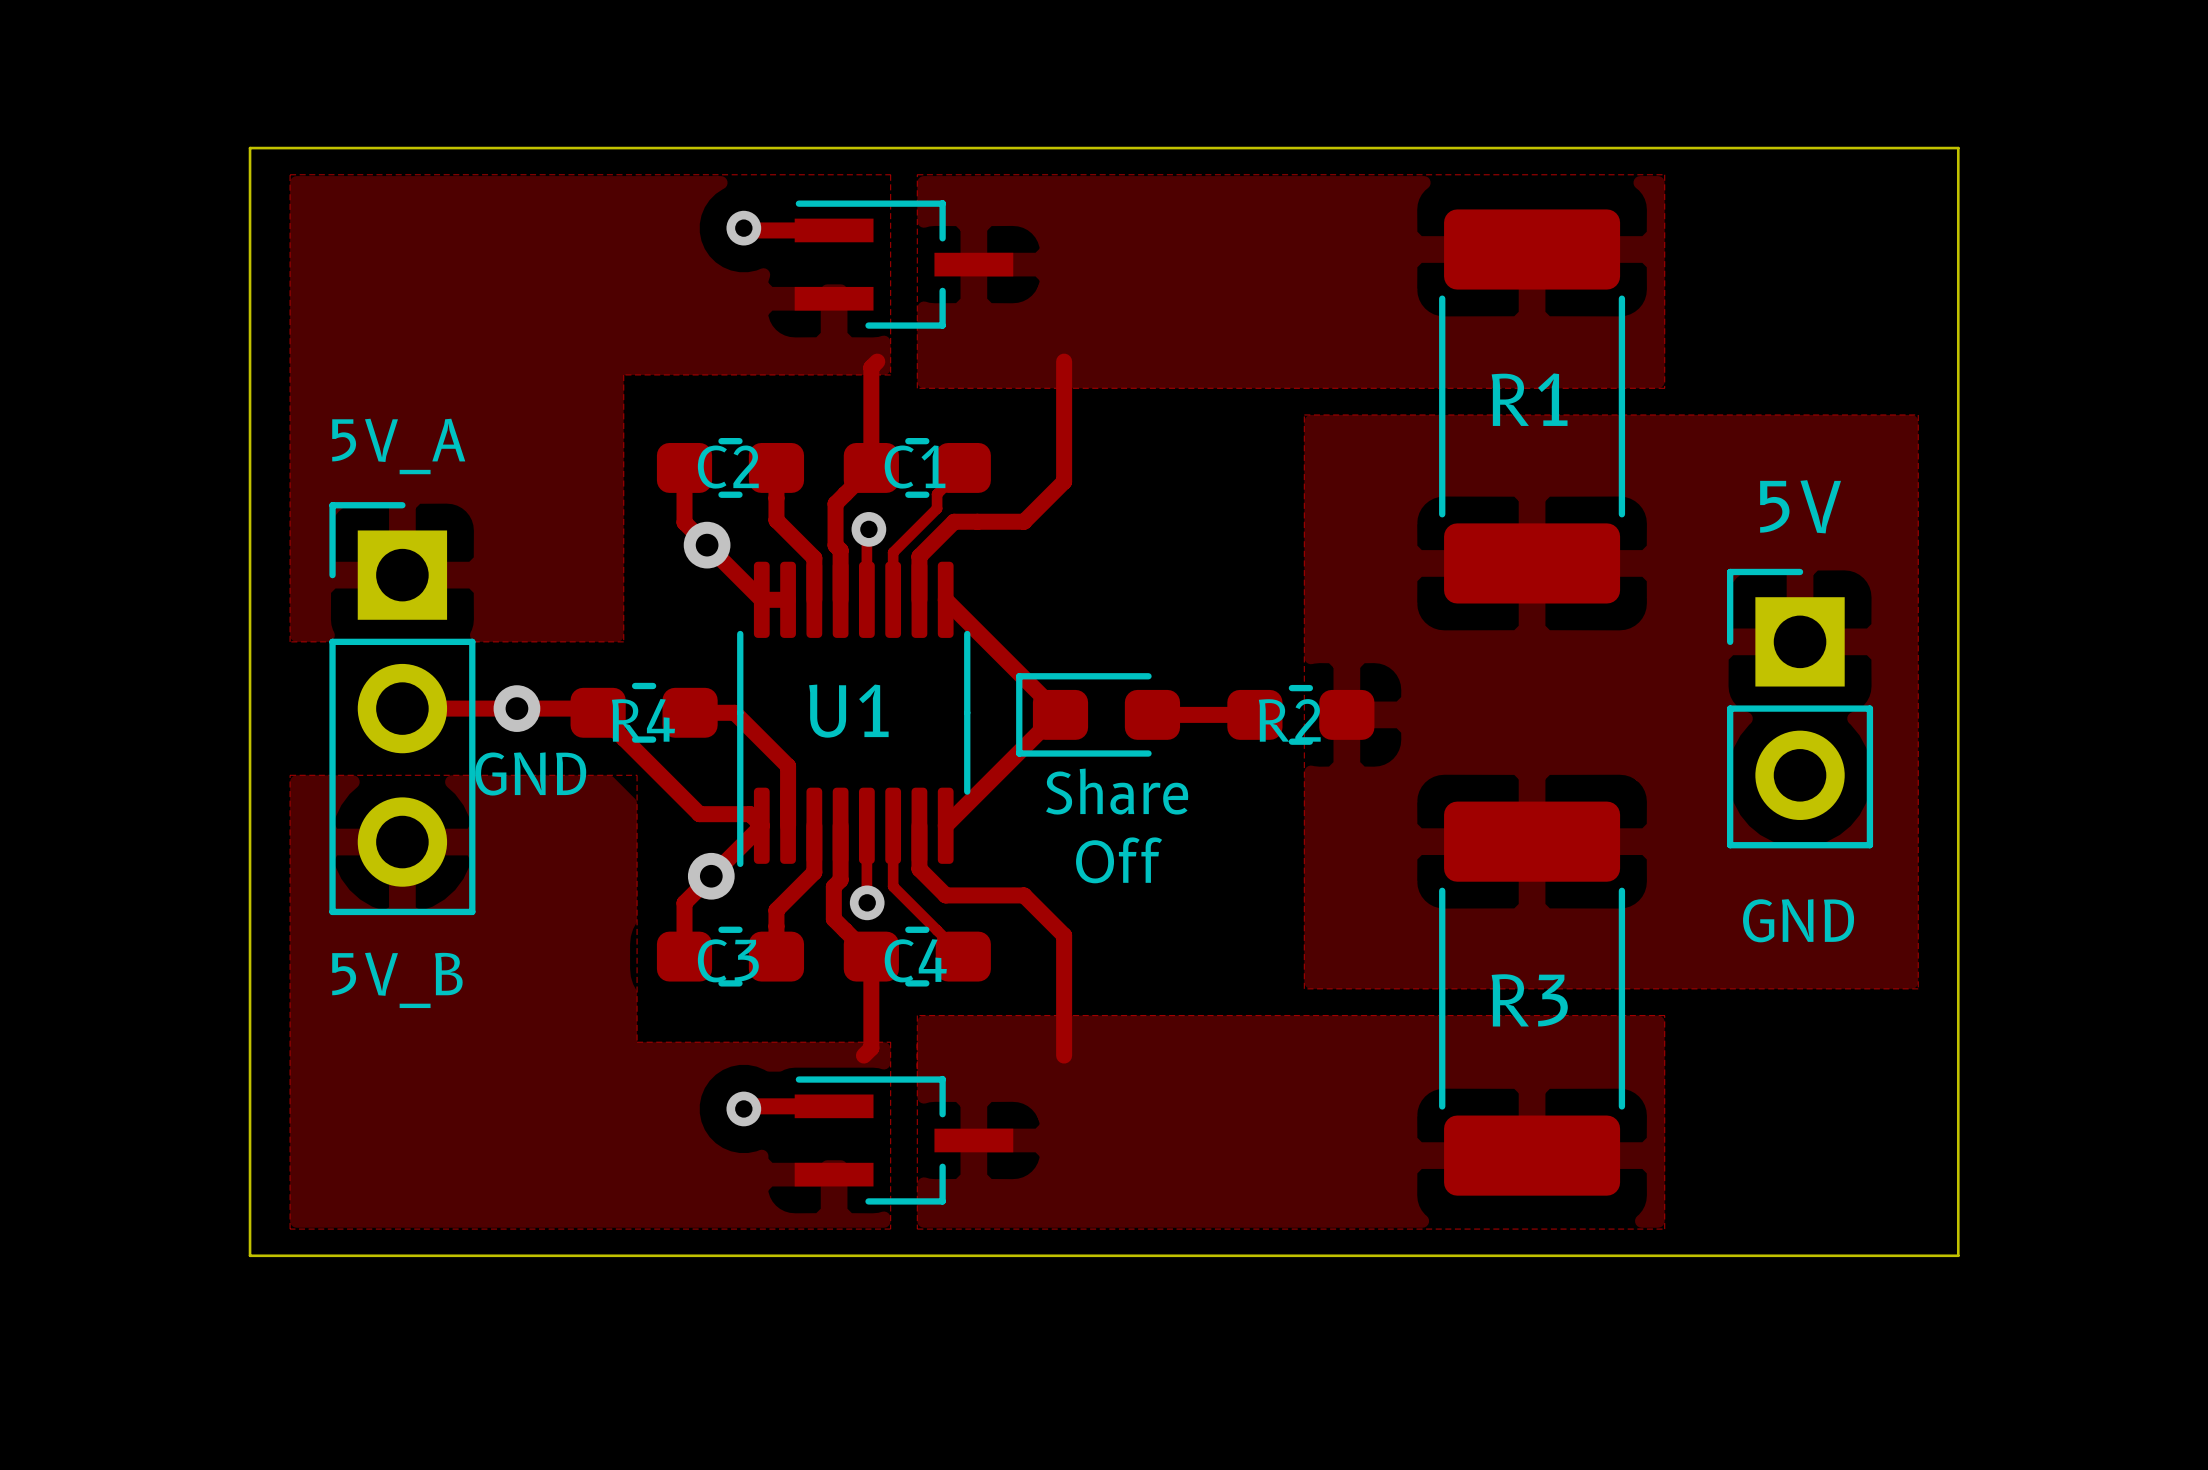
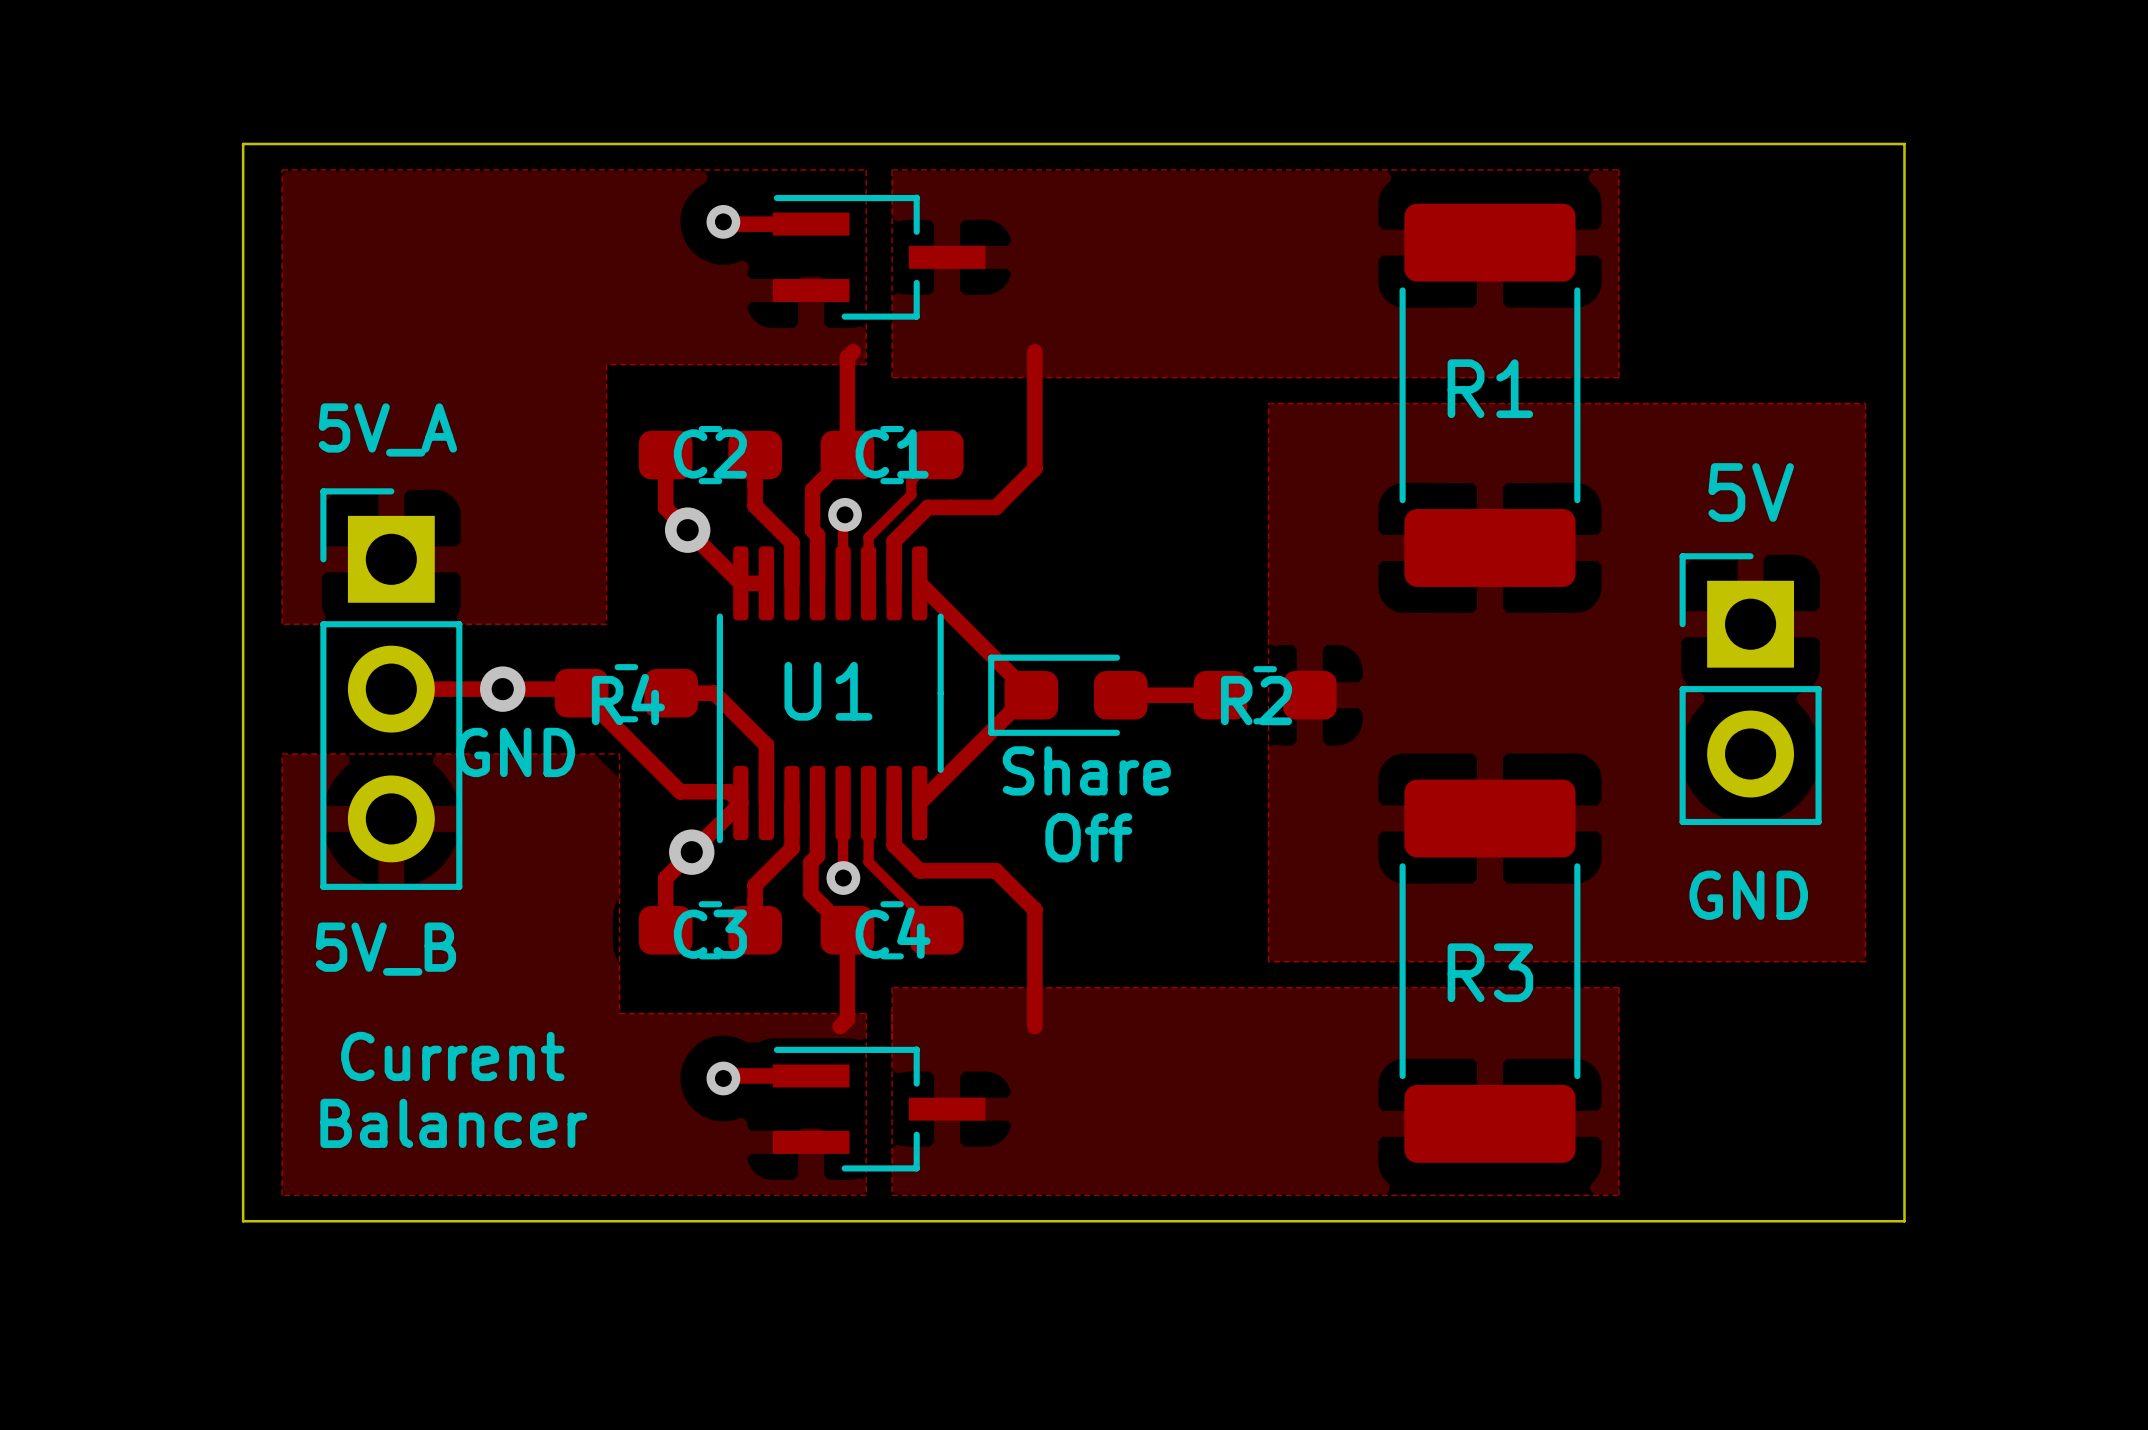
text: none -> Current (452, 1056)
text: none -> Balancer (453, 1123)

